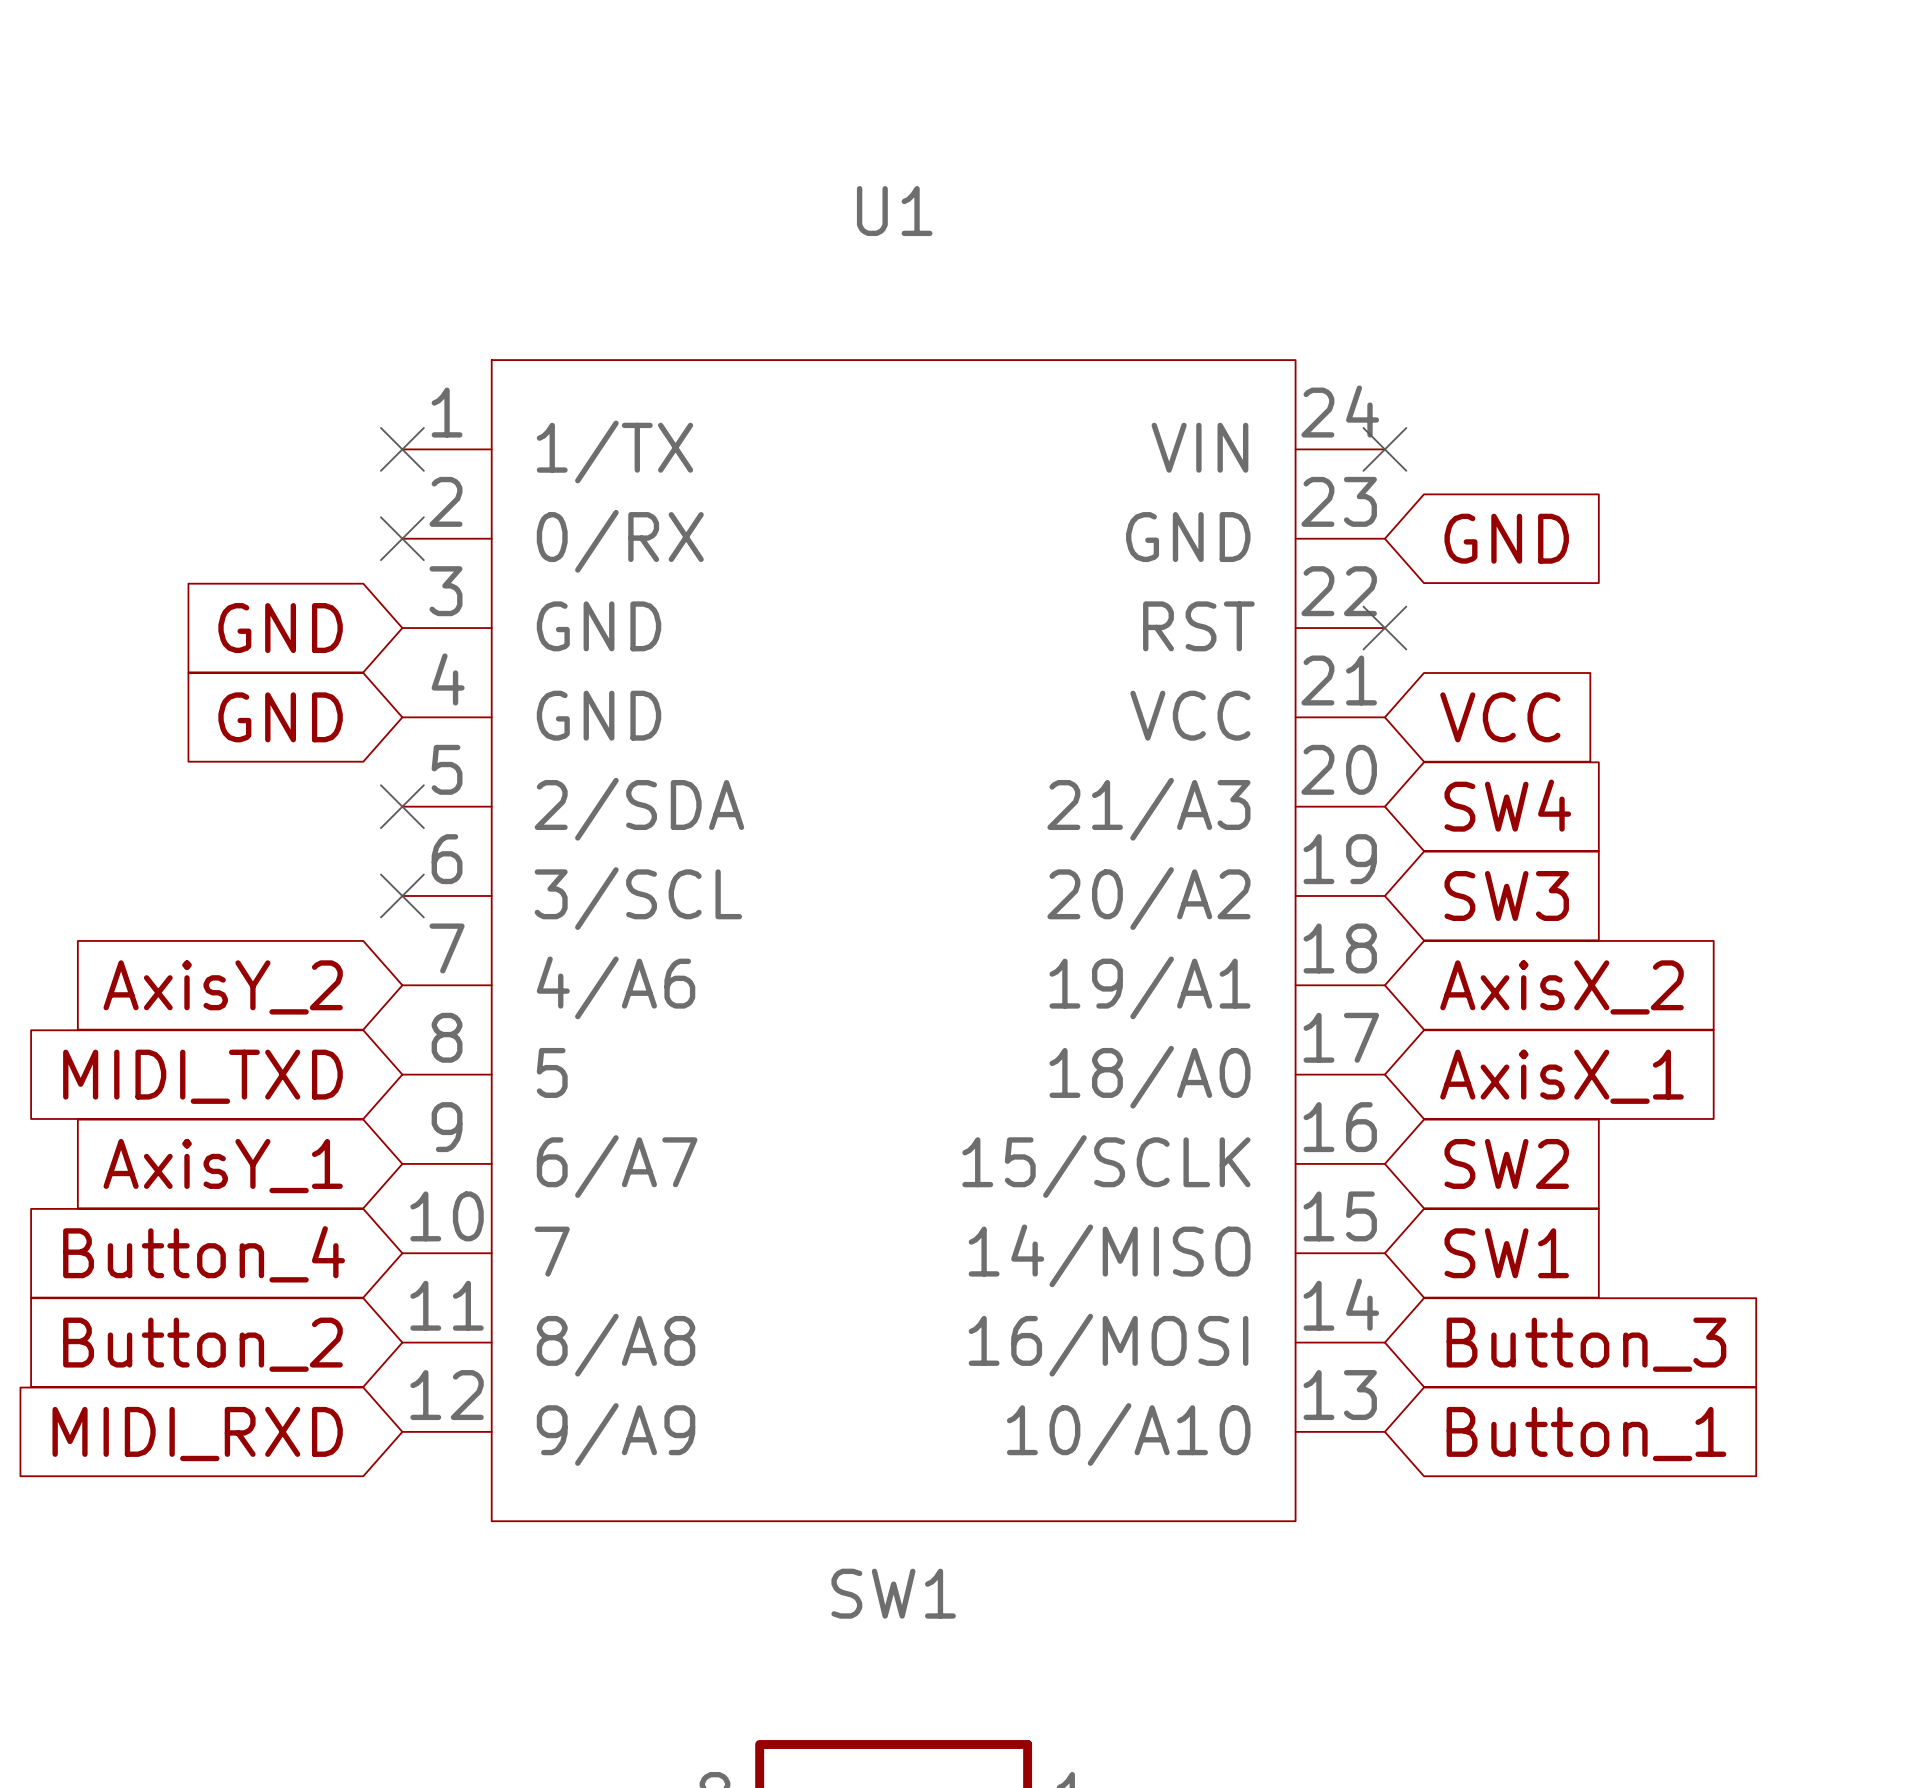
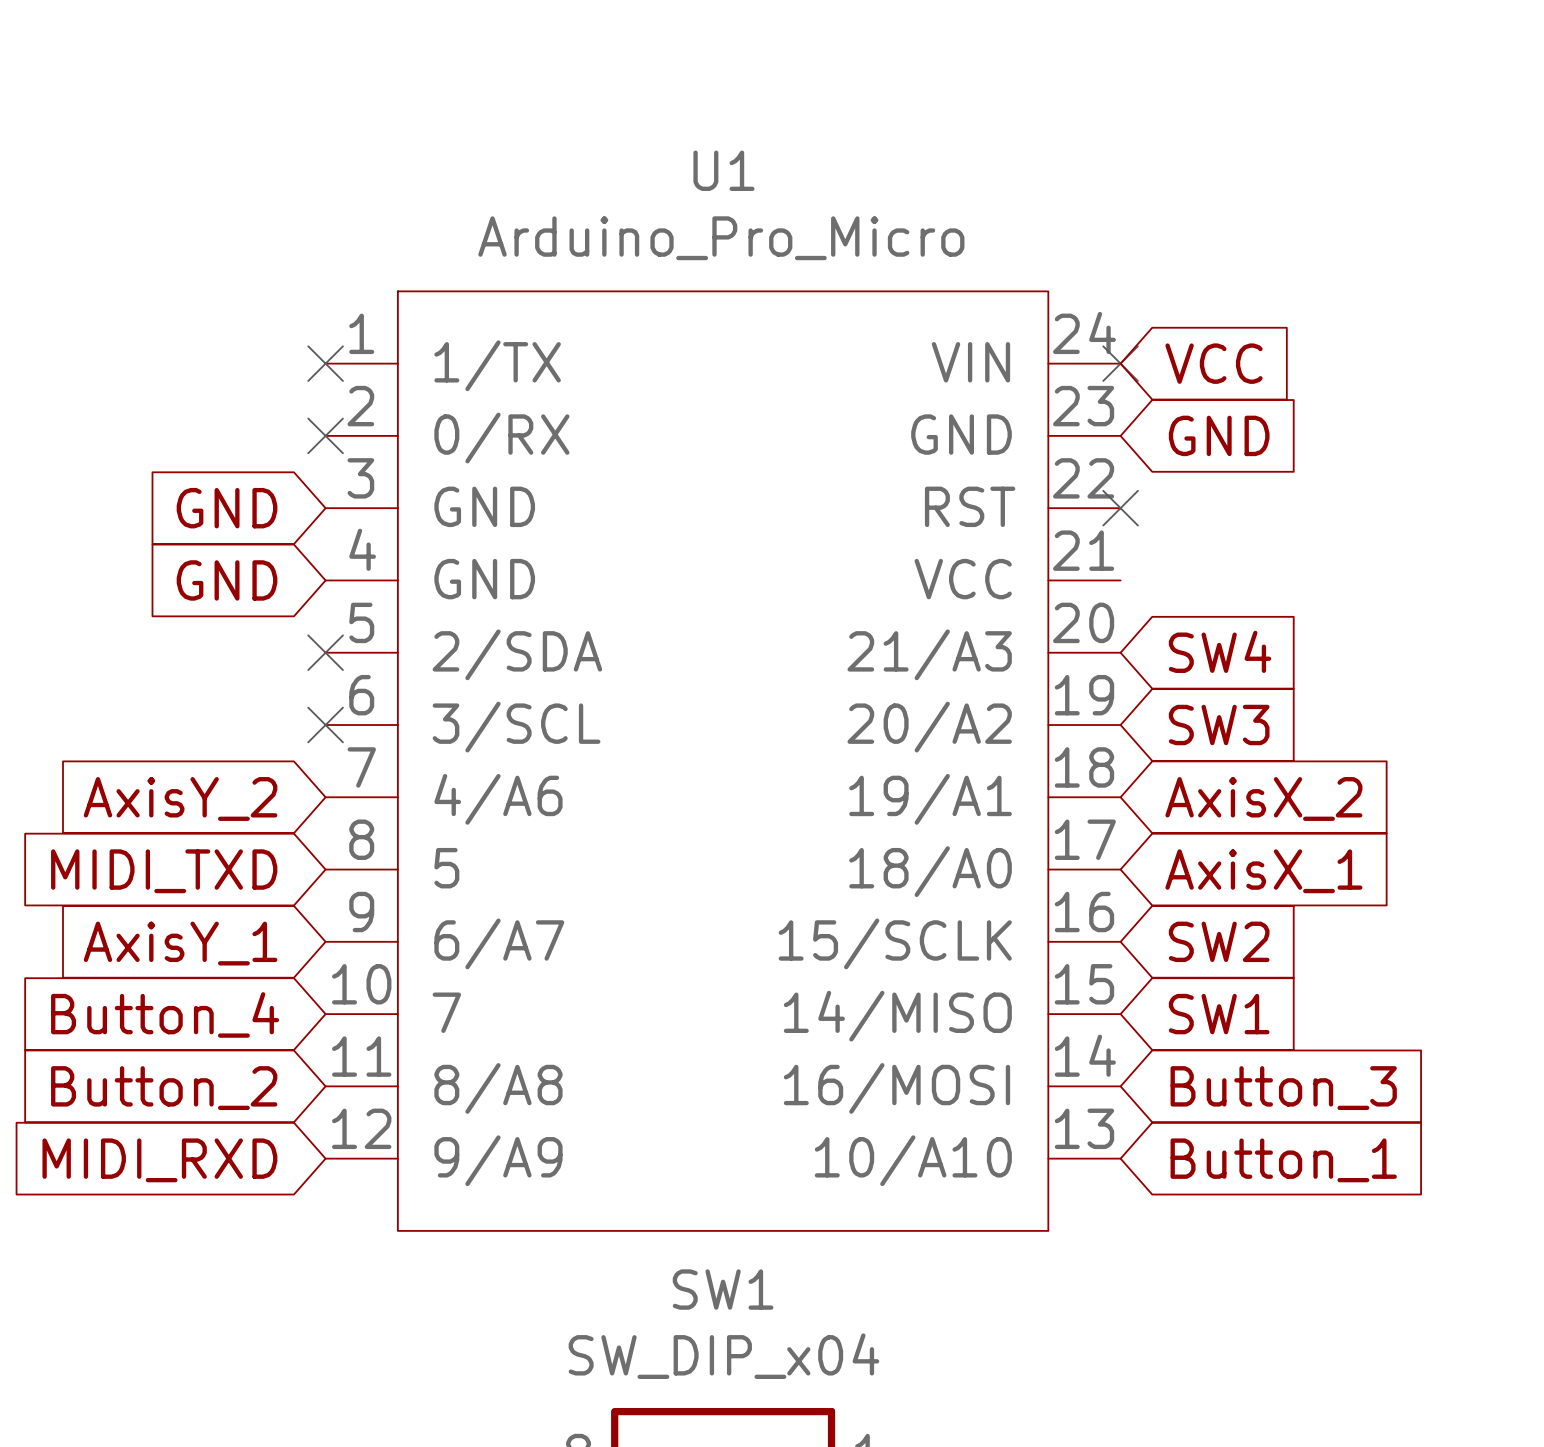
U1 value: none -> Arduino_Pro_Micro (721, 238)
global label position: VCC (1500, 717) -> VCC (1214, 363)
SW1 value: none -> SW_DIP_x04 (723, 1356)

